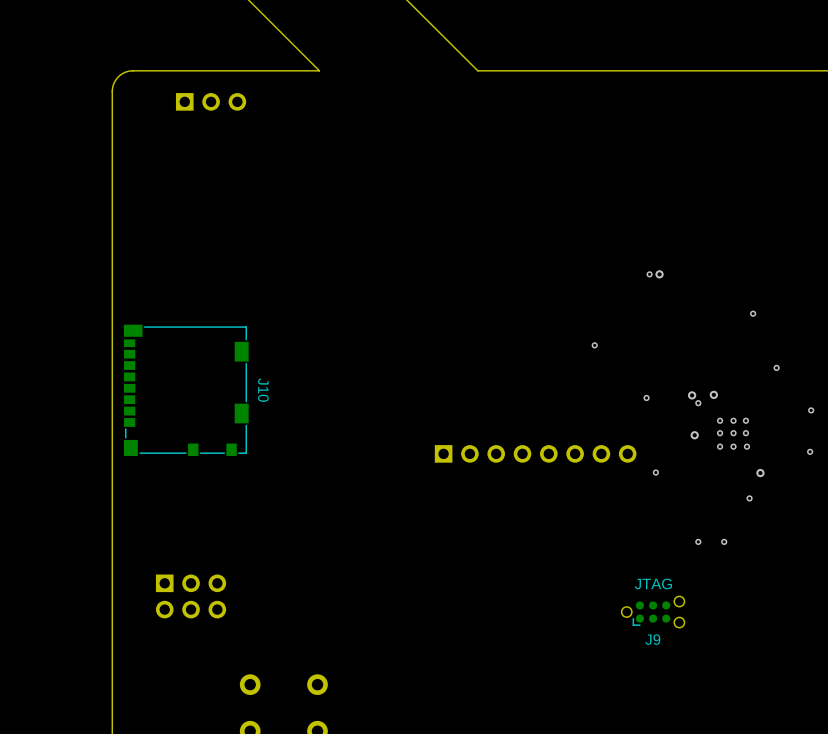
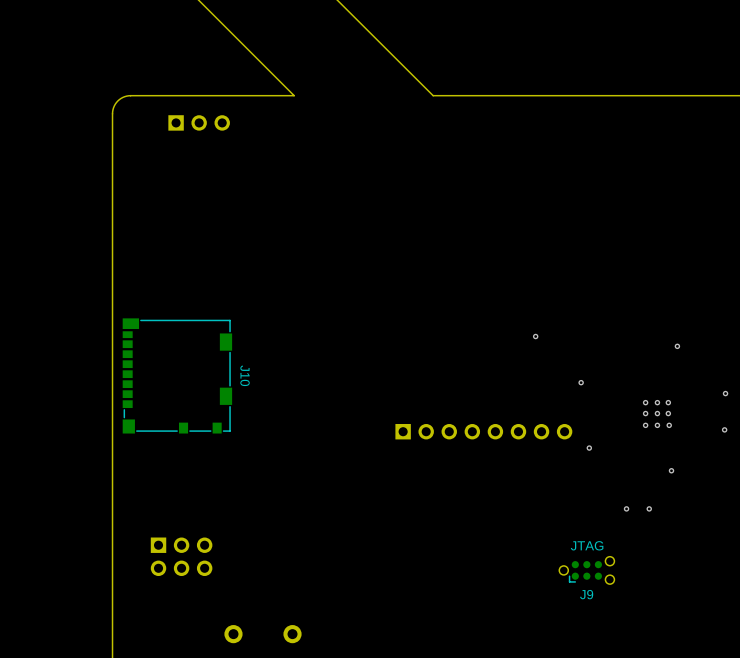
via: (649, 274) -> none
via: (659, 274) -> none
via: (753, 313) -> none
via: none -> (677, 346)
via: (776, 367) -> none
via: (713, 394) -> none
via: (692, 395) -> none
via: (698, 403) -> none
via: (694, 435) -> none
via: (760, 473) -> none

